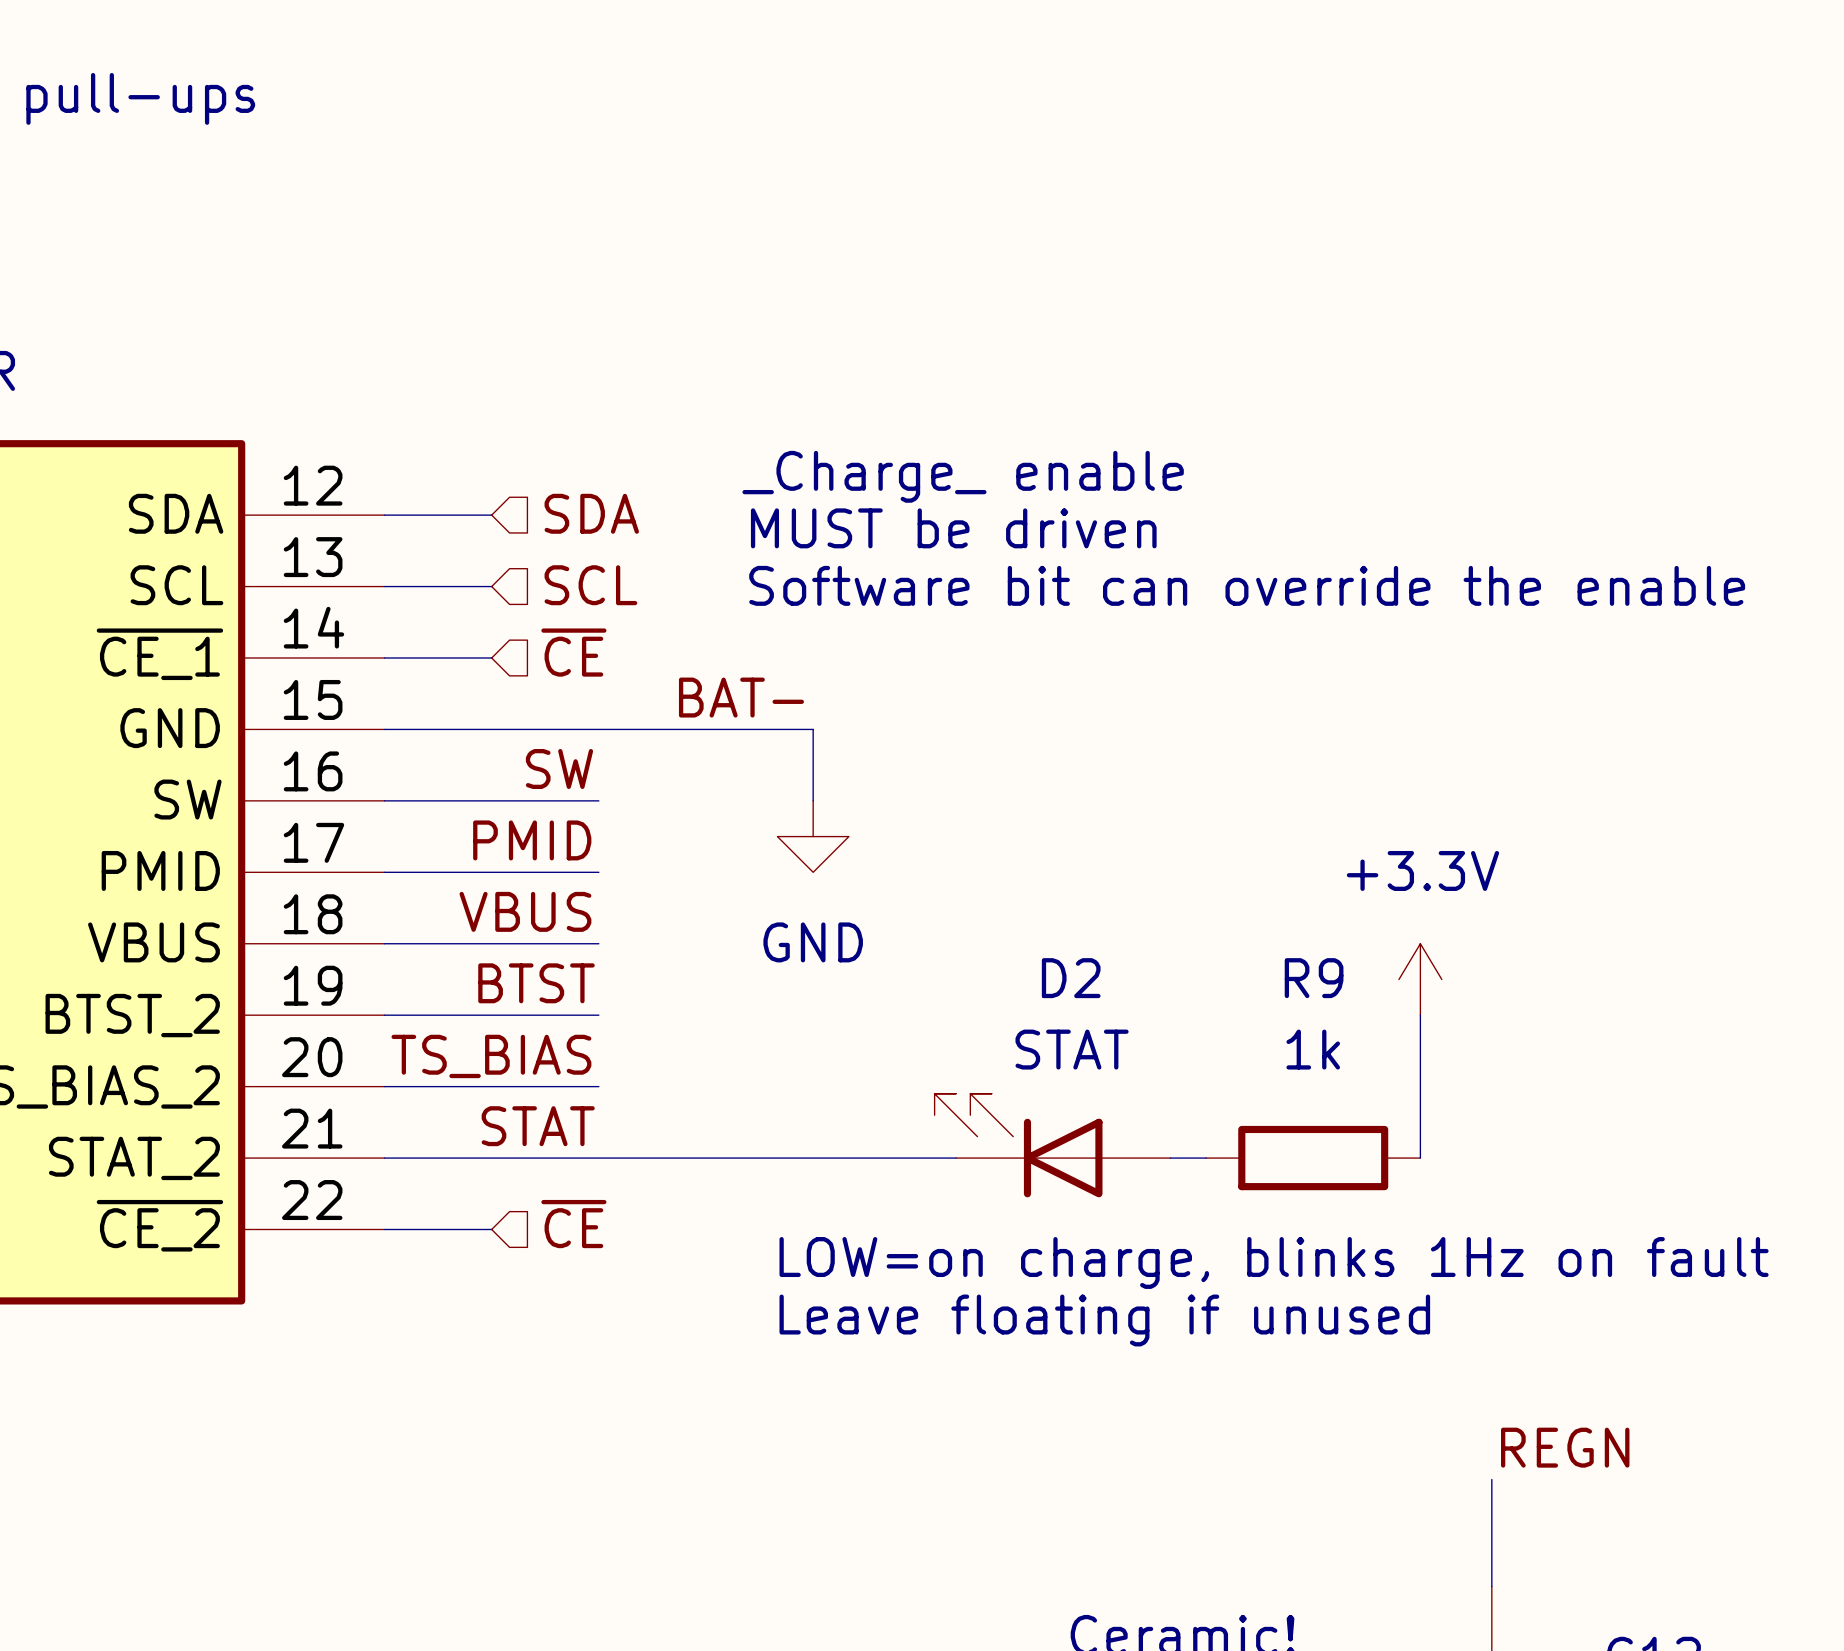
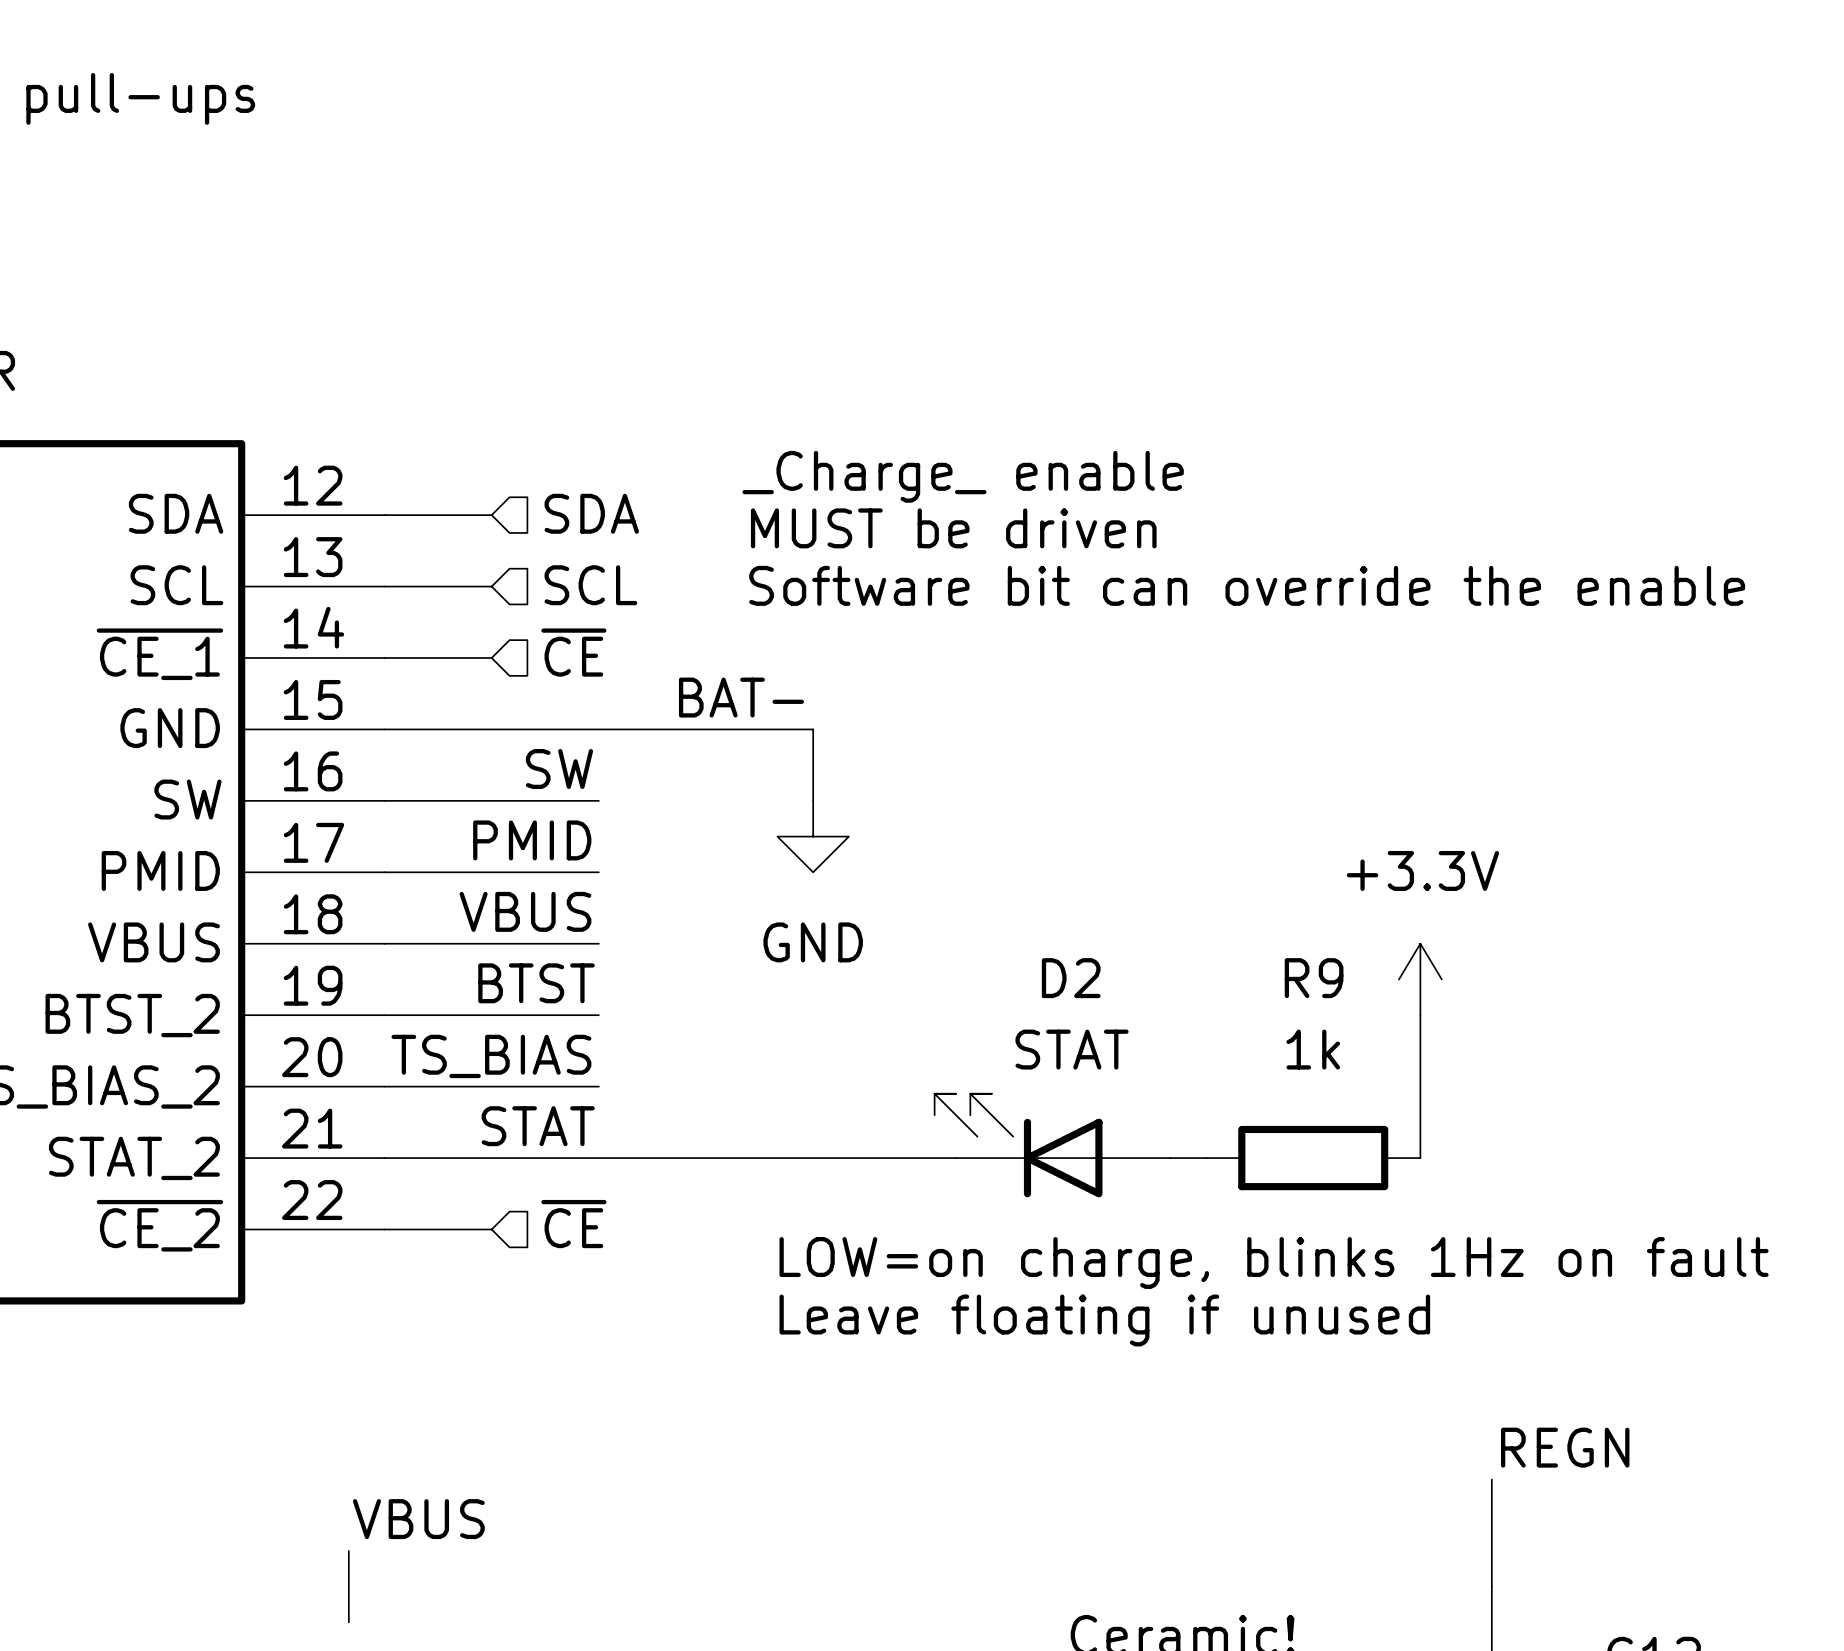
label: none -> VBUS (418, 1519)
wire: none -> (348, 1550) (348, 1622)

